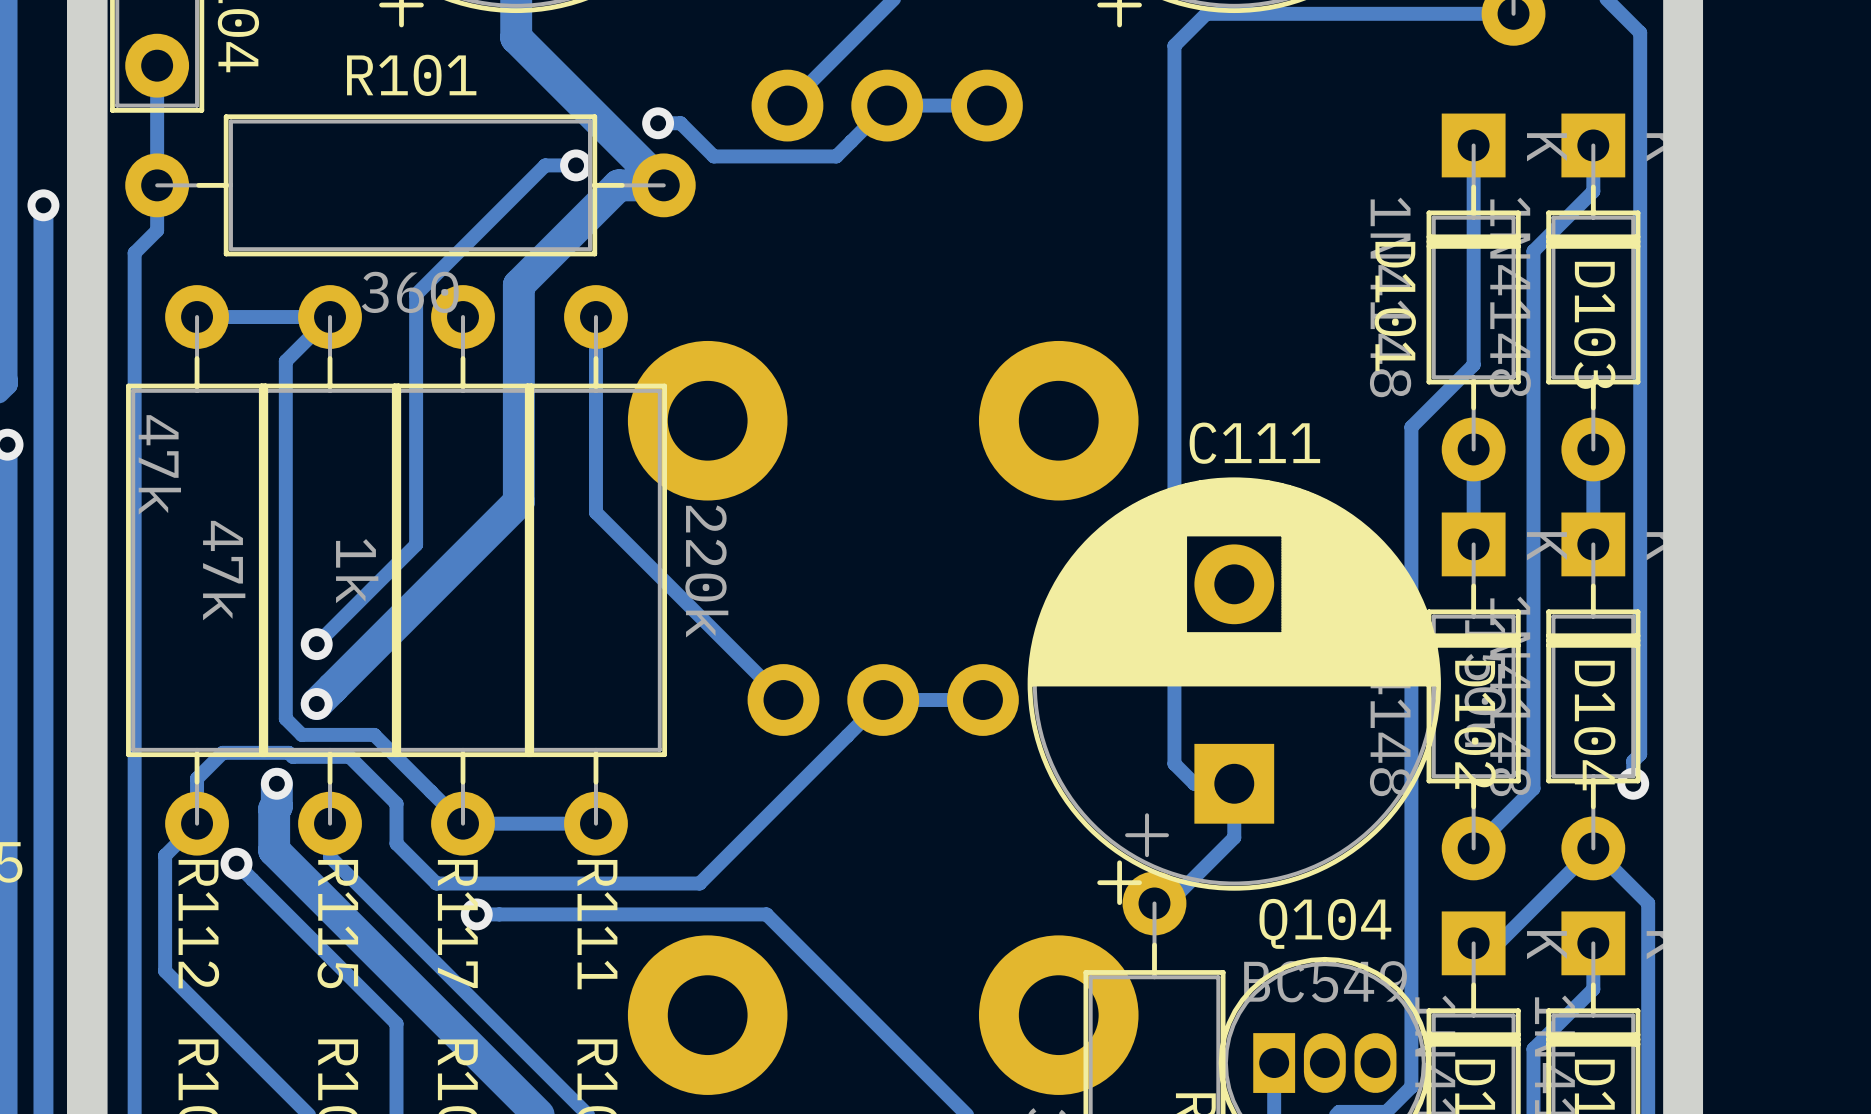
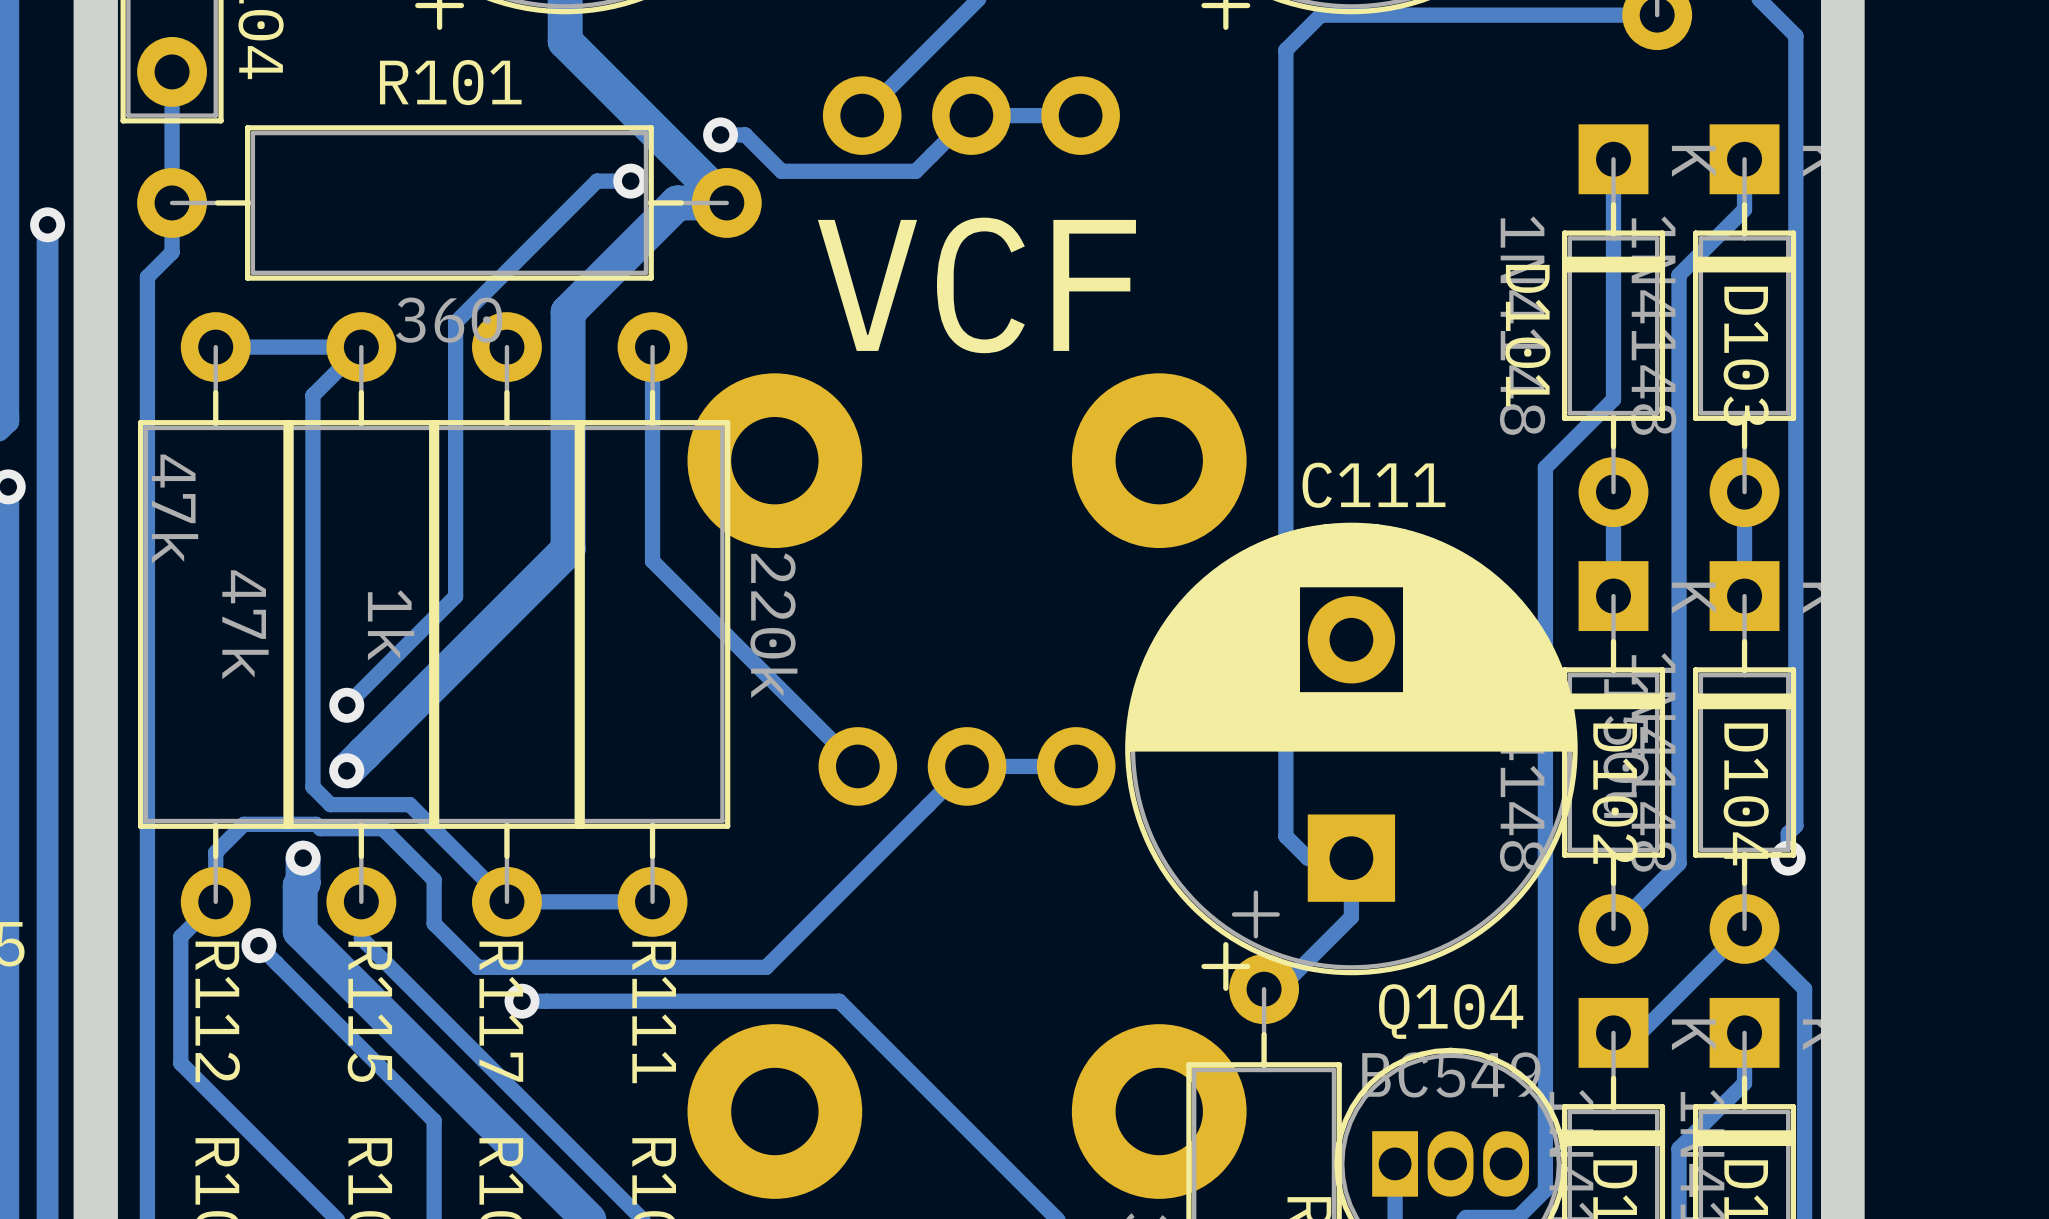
text: none -> VCF (976, 285)

